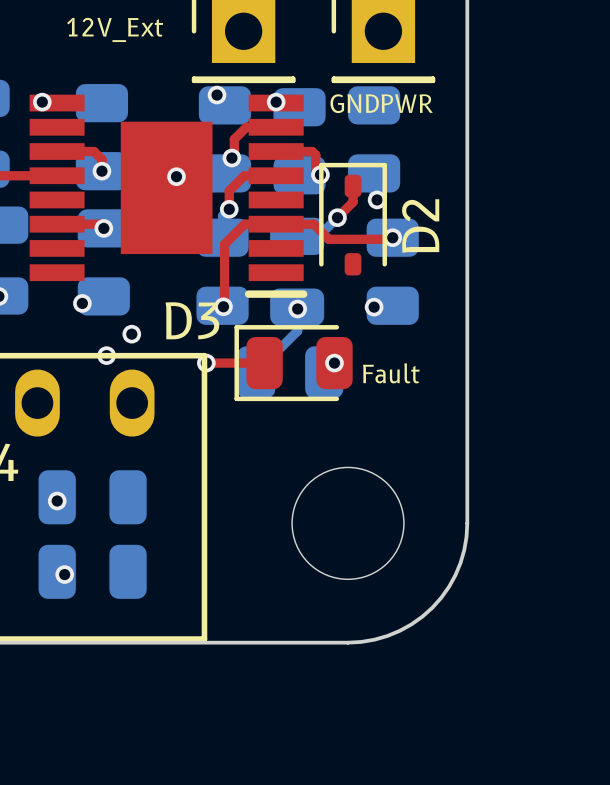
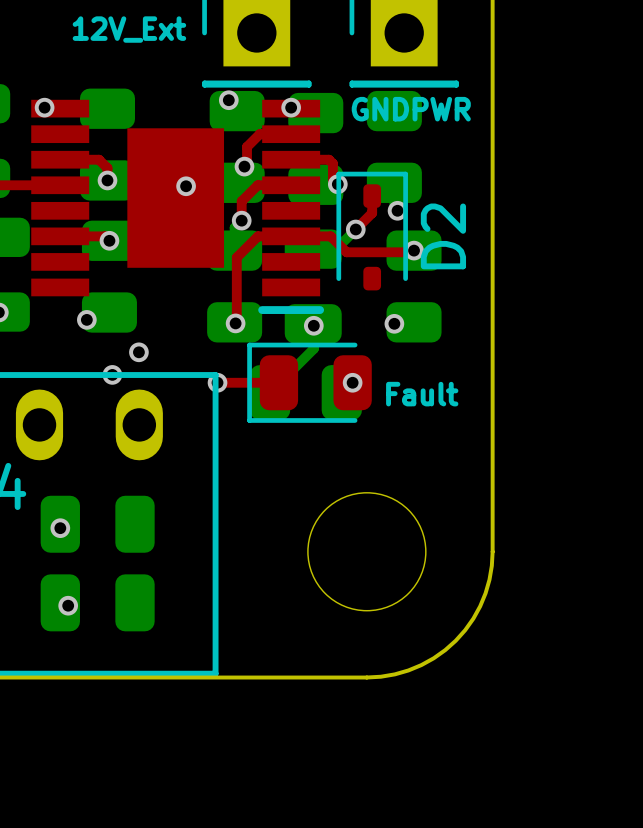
D3 name: D3 (192, 320) -> none

